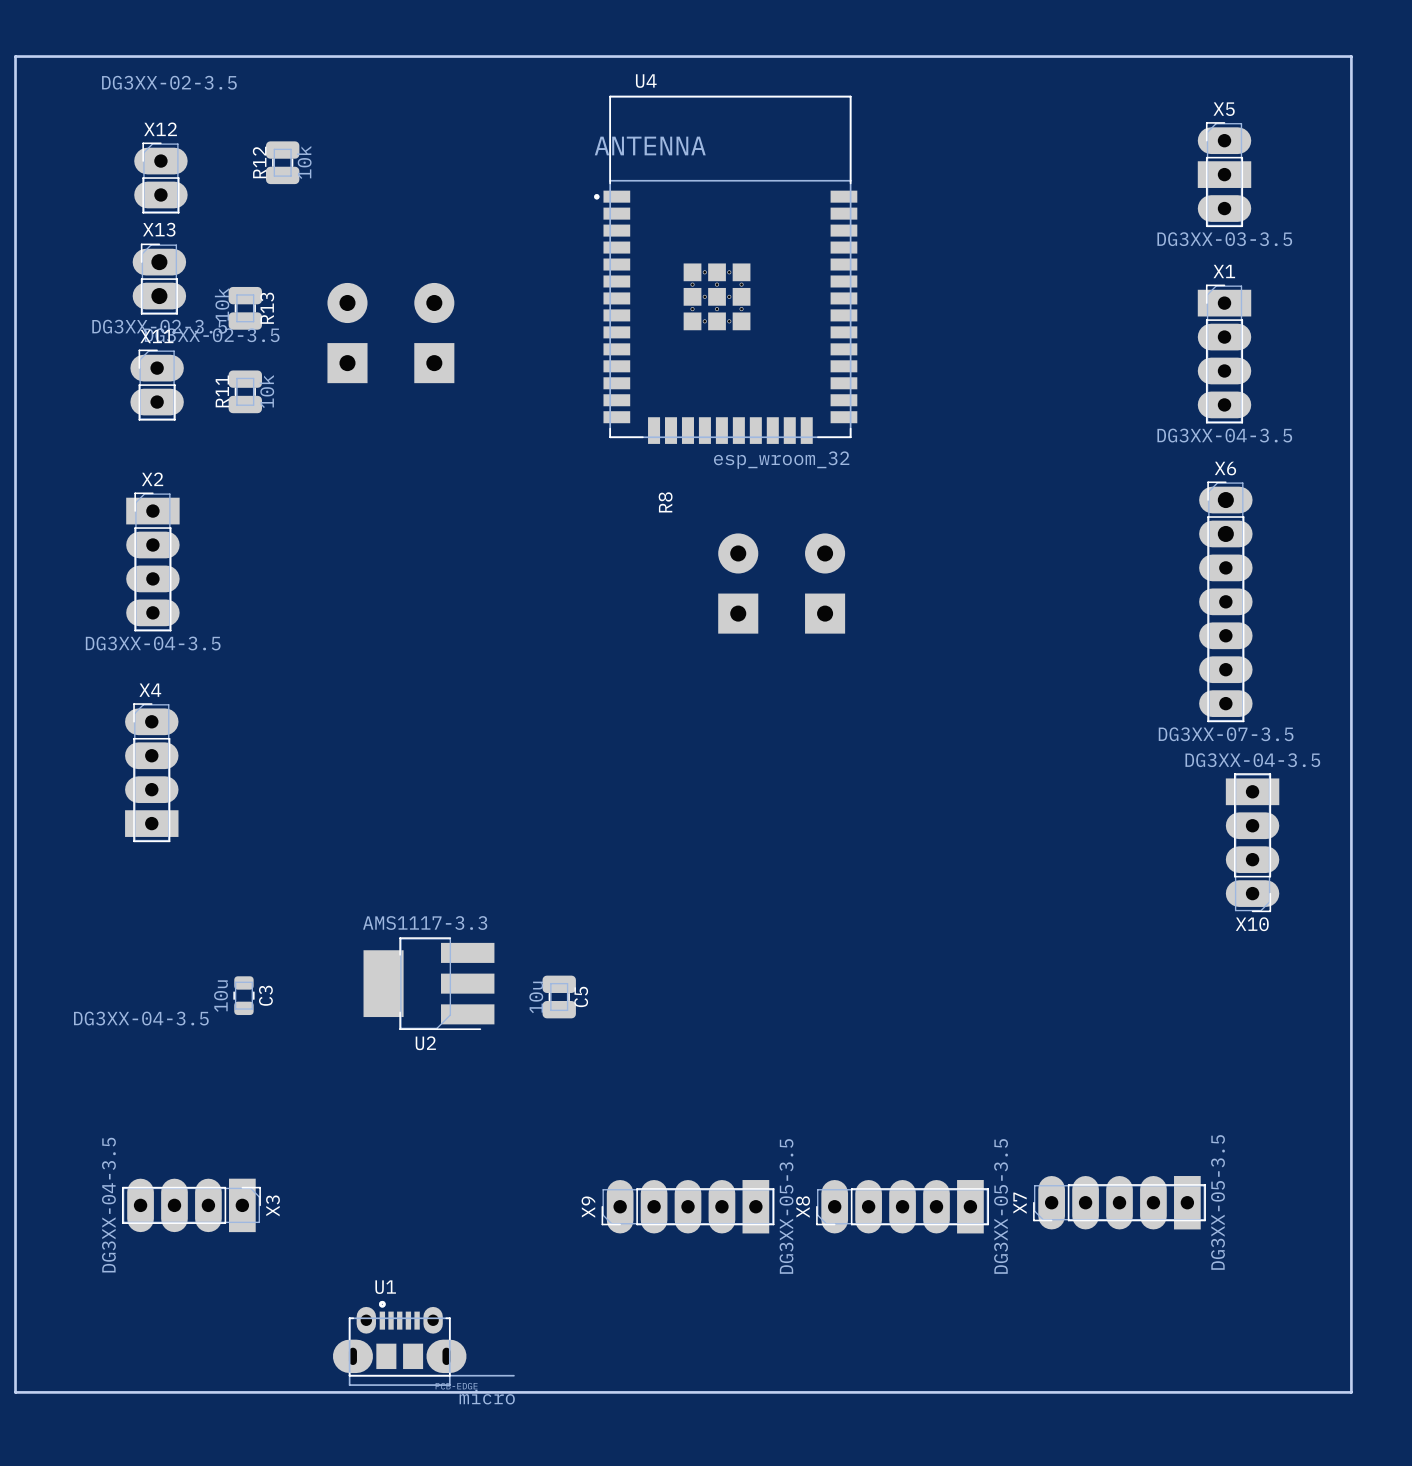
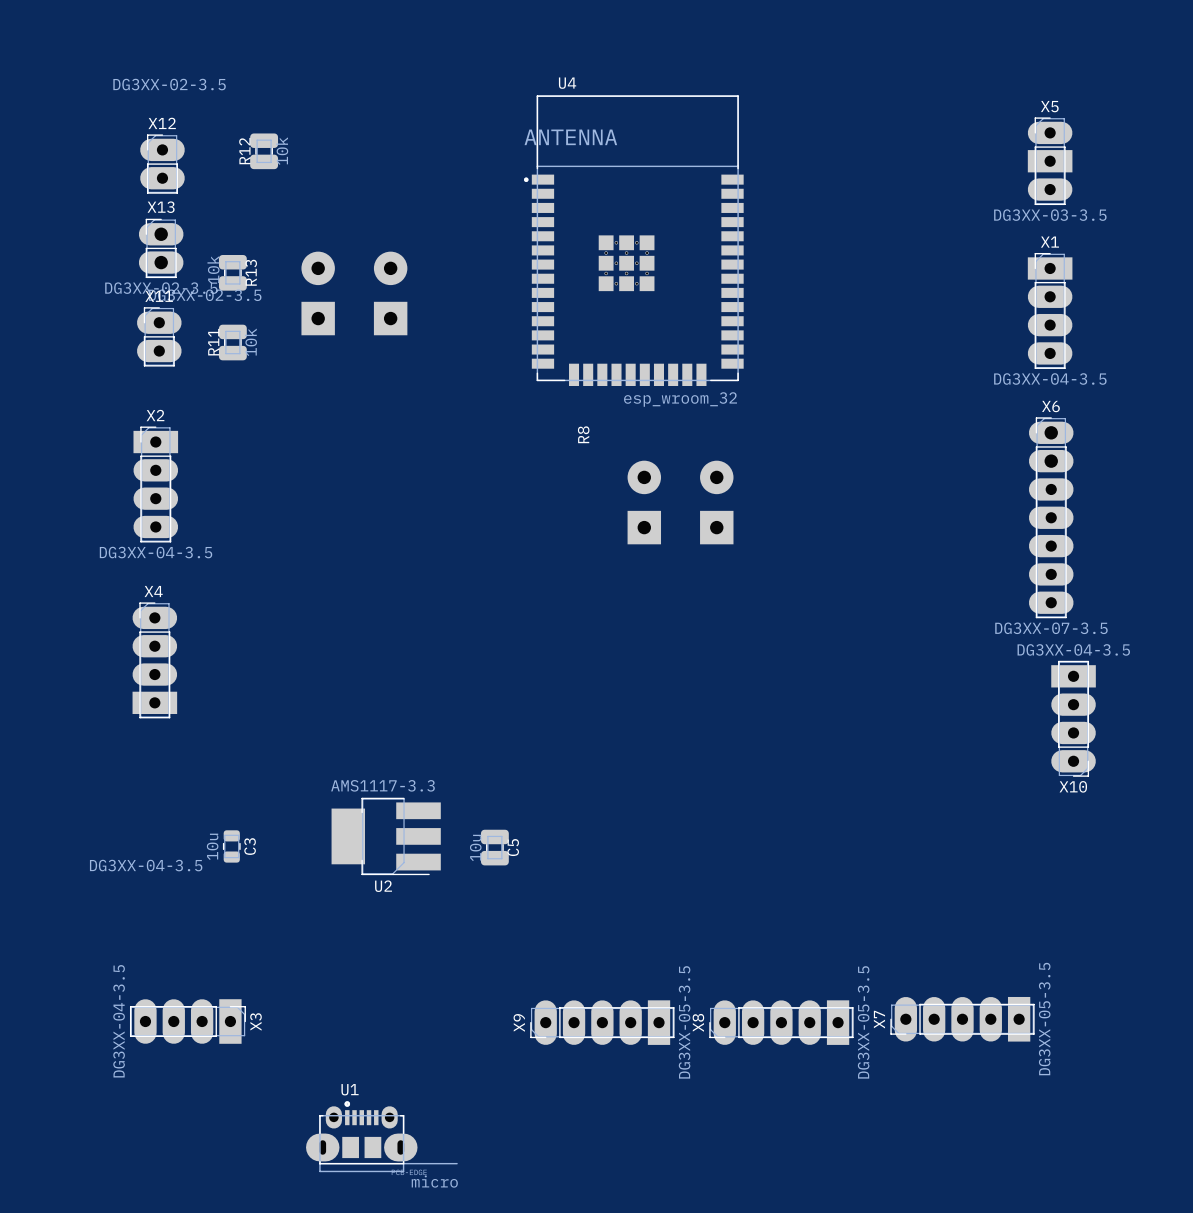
board edge: (15, 56) (1351, 56) (1351, 1392) (15, 1392) (15, 56) -> none

